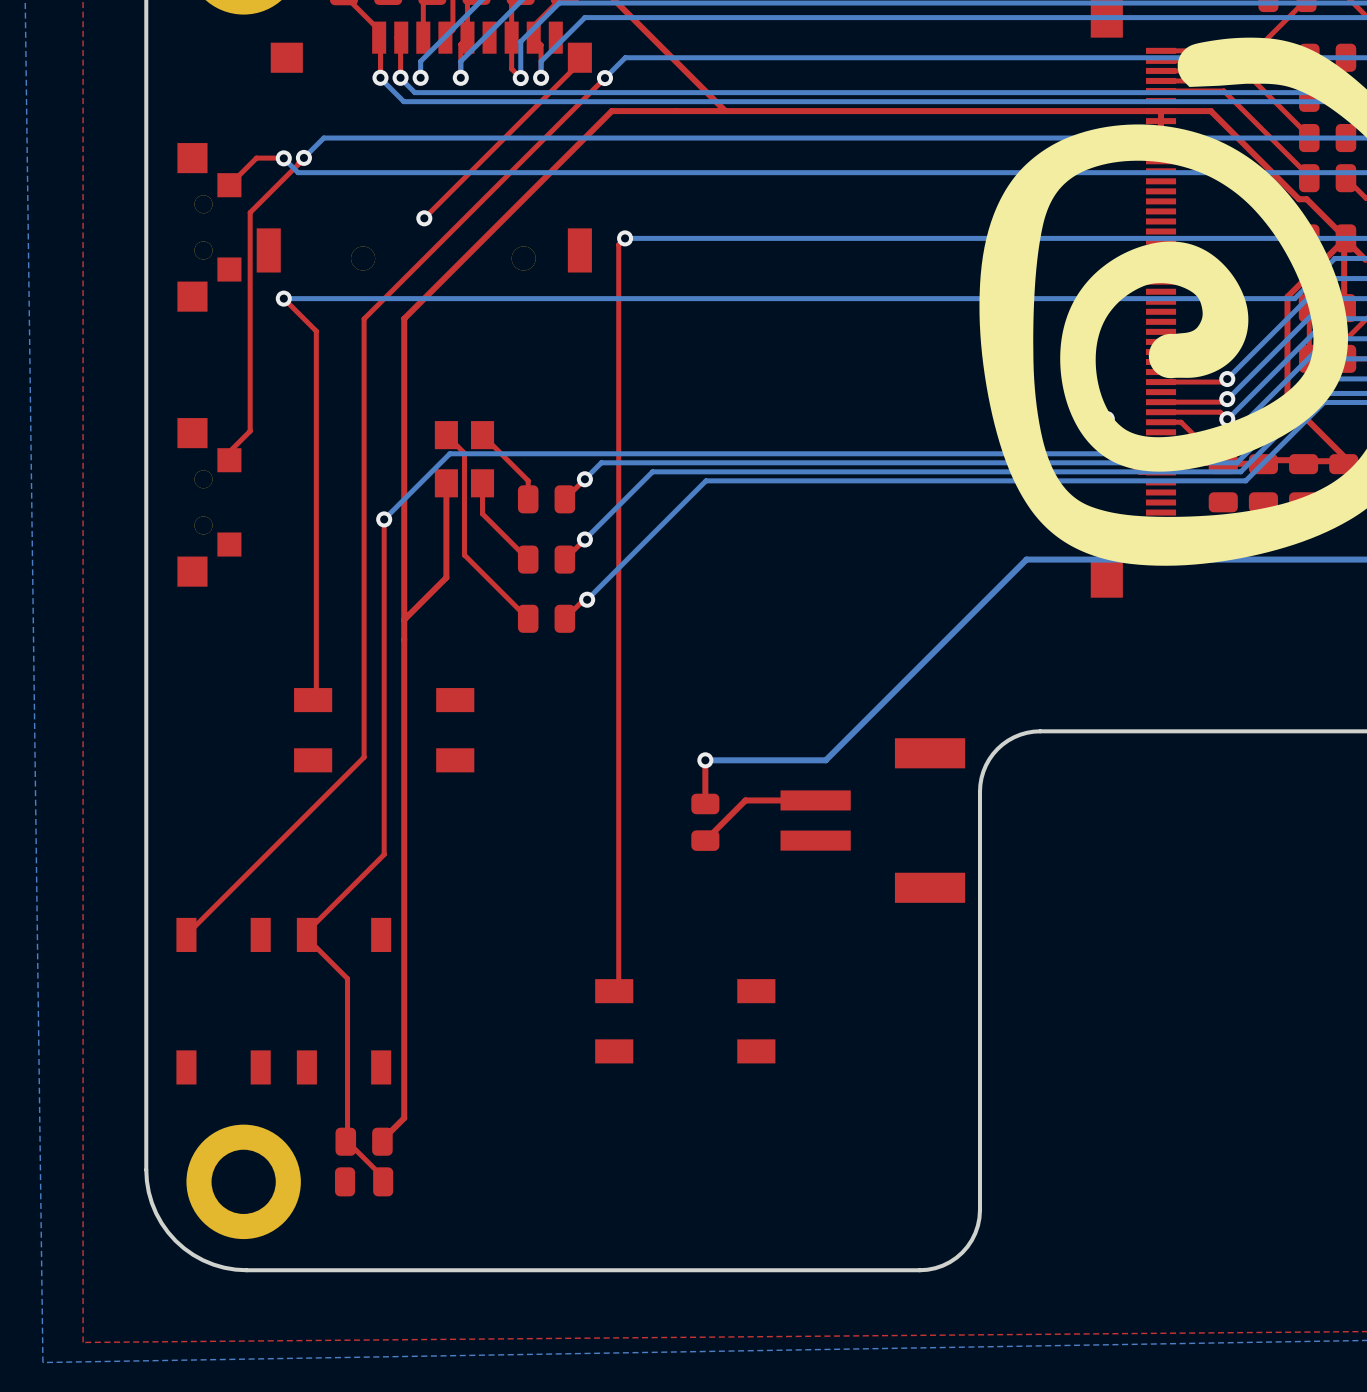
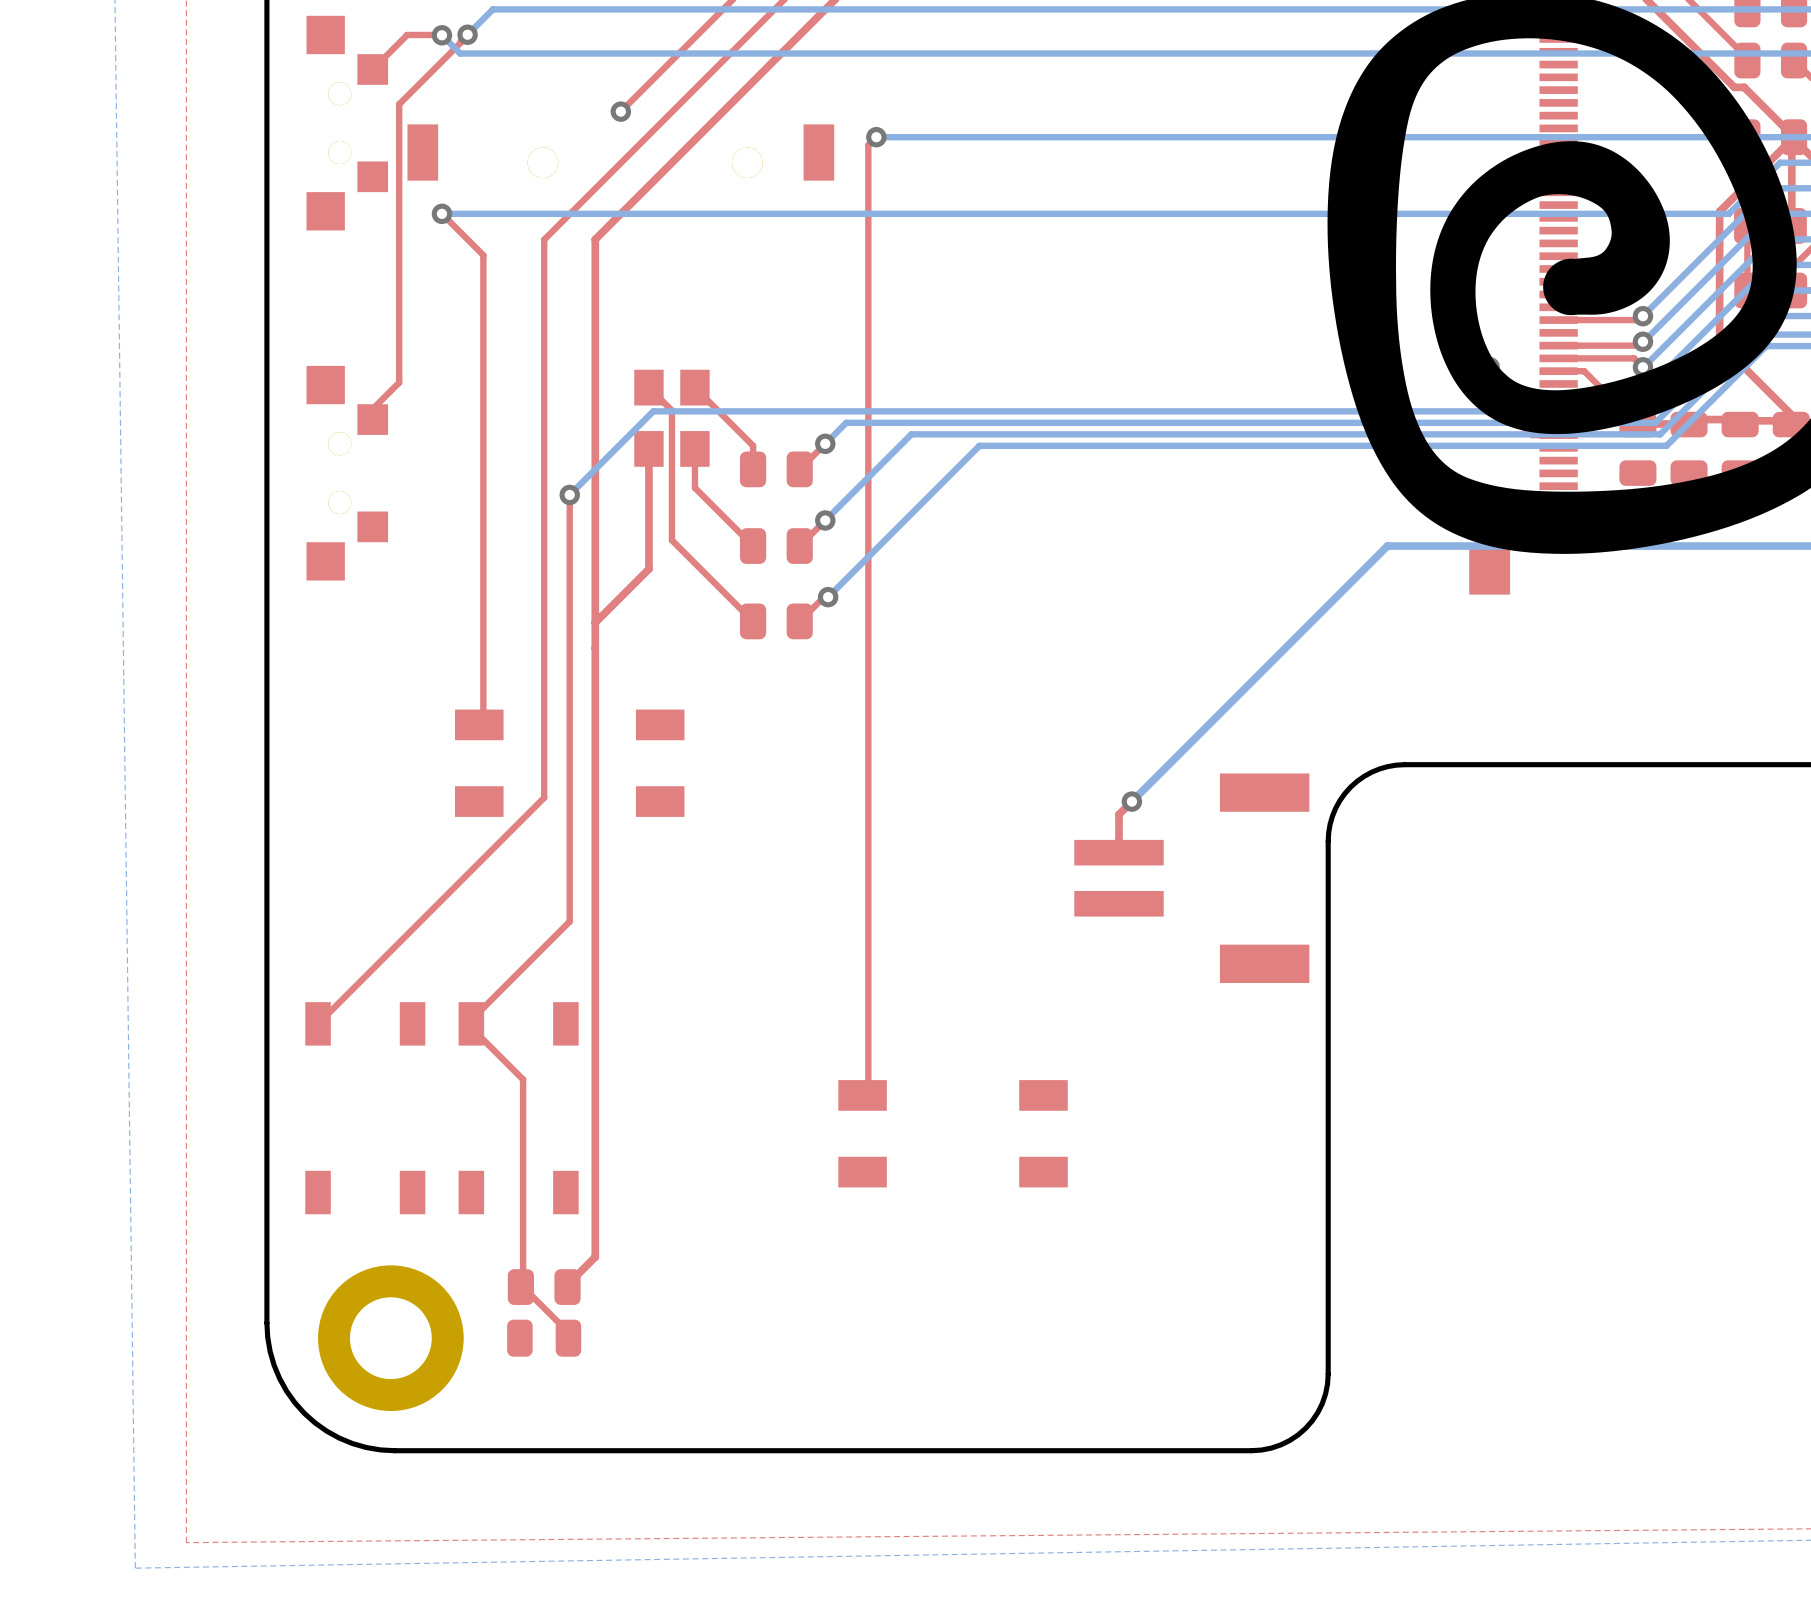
top track: (705, 760) (705, 803) -> none
via position: (705, 760) -> (1131, 801)
bottom track: (825, 760) (705, 760) -> none
top track: (815, 800) (745, 800) (705, 840) -> (1118, 852) (1118, 814) (1131, 801)
part: (705, 822) -> none

